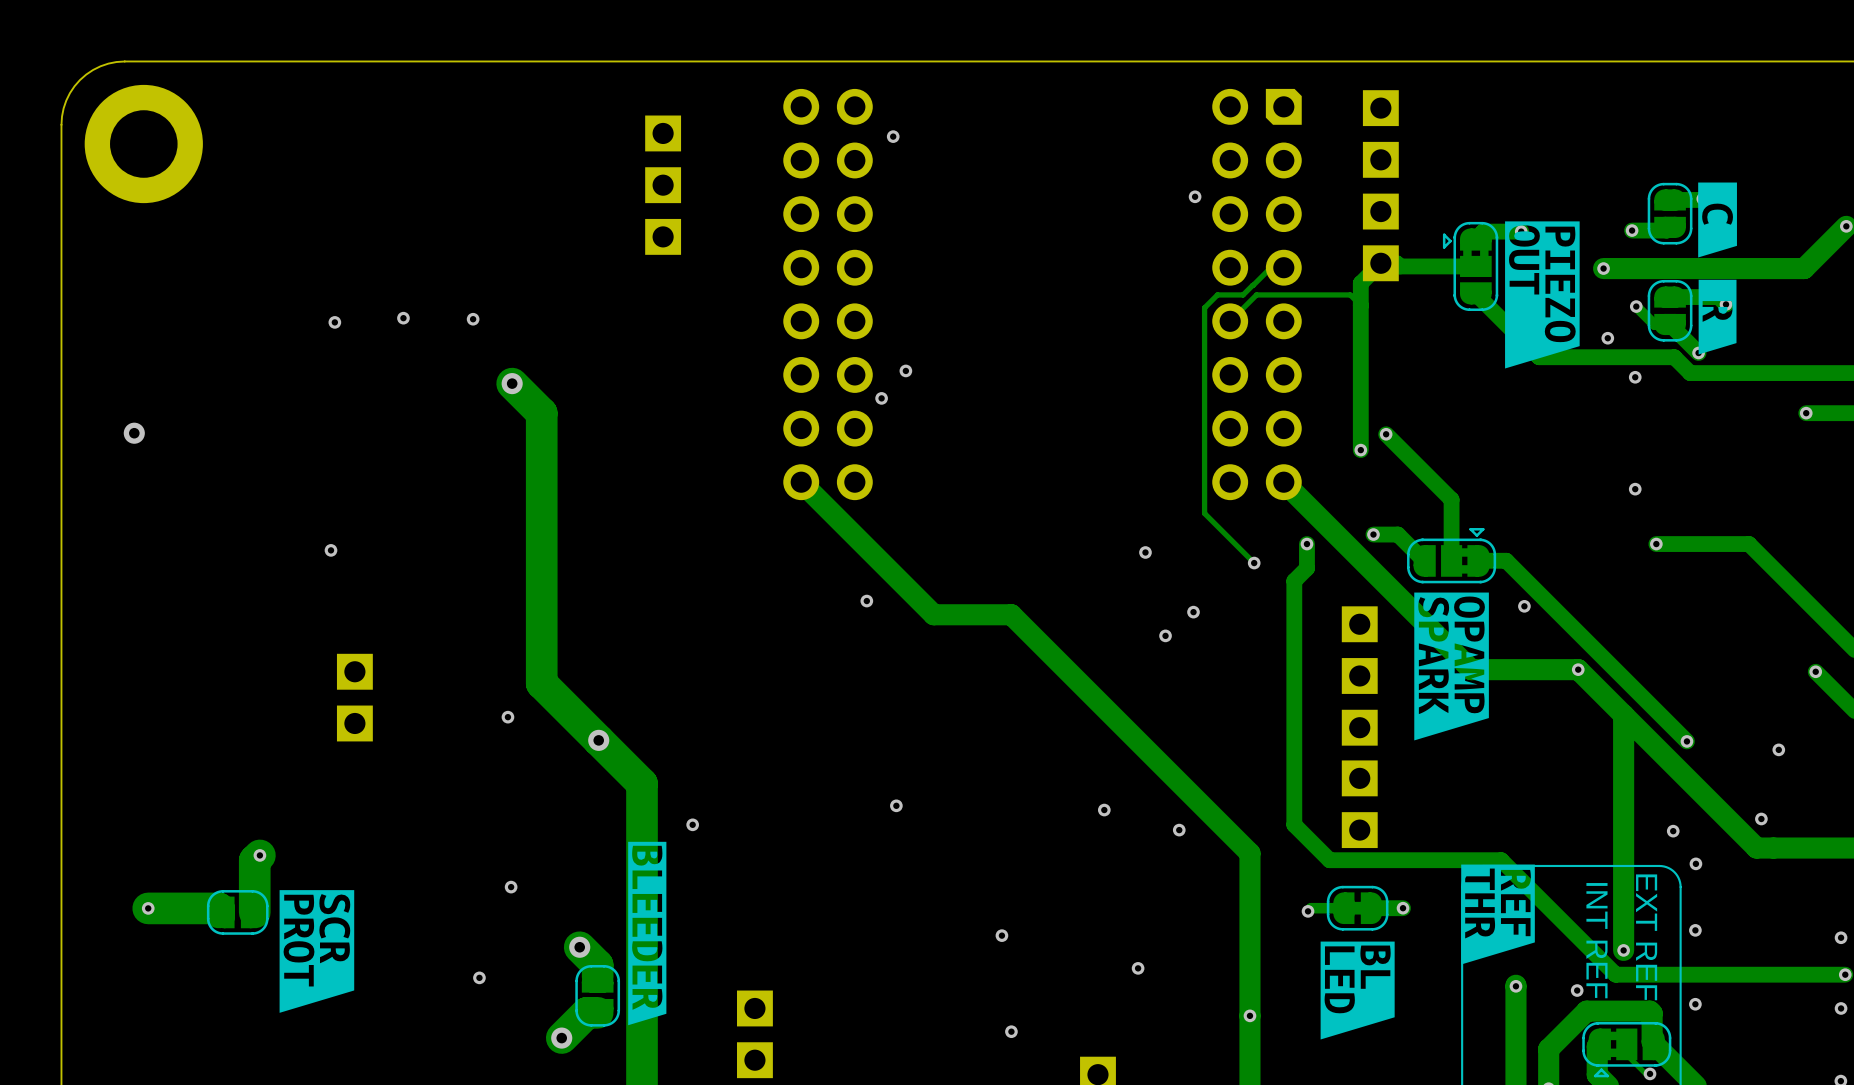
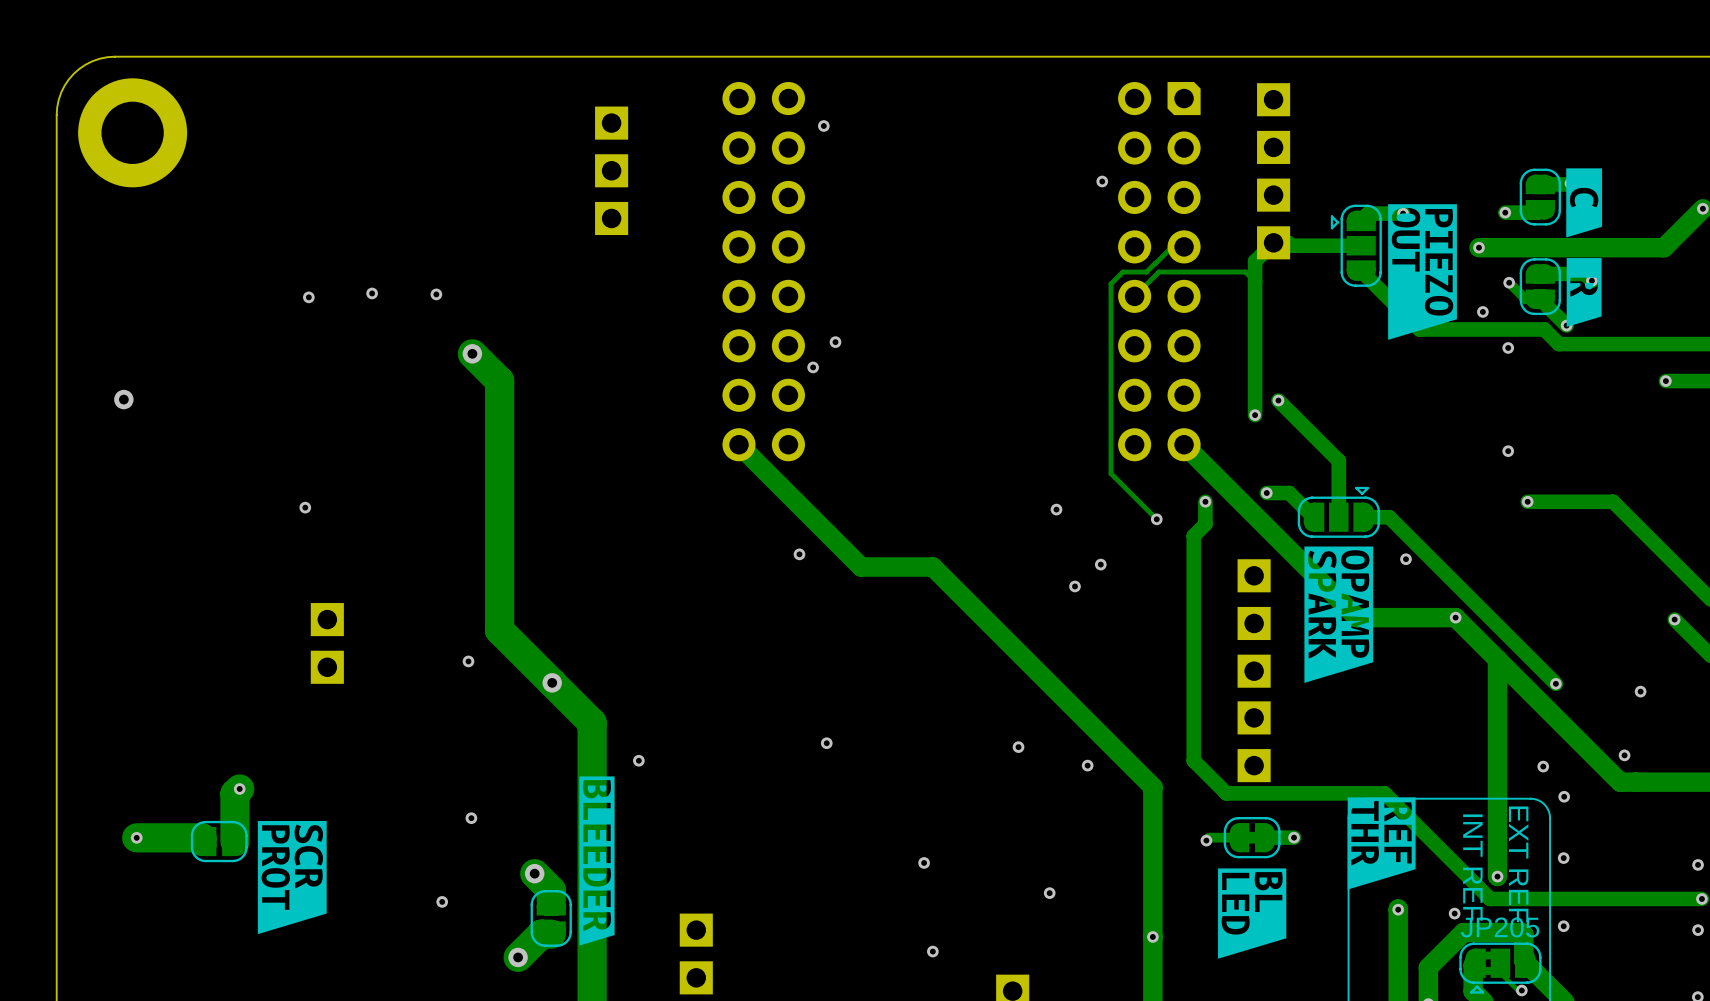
part footprint: [1442, 221, 1499, 311] -> [1330, 204, 1382, 287]
part footprint: [1407, 528, 1497, 584] -> [1297, 486, 1380, 538]
JP205 name: none -> JP205 (1500, 927)

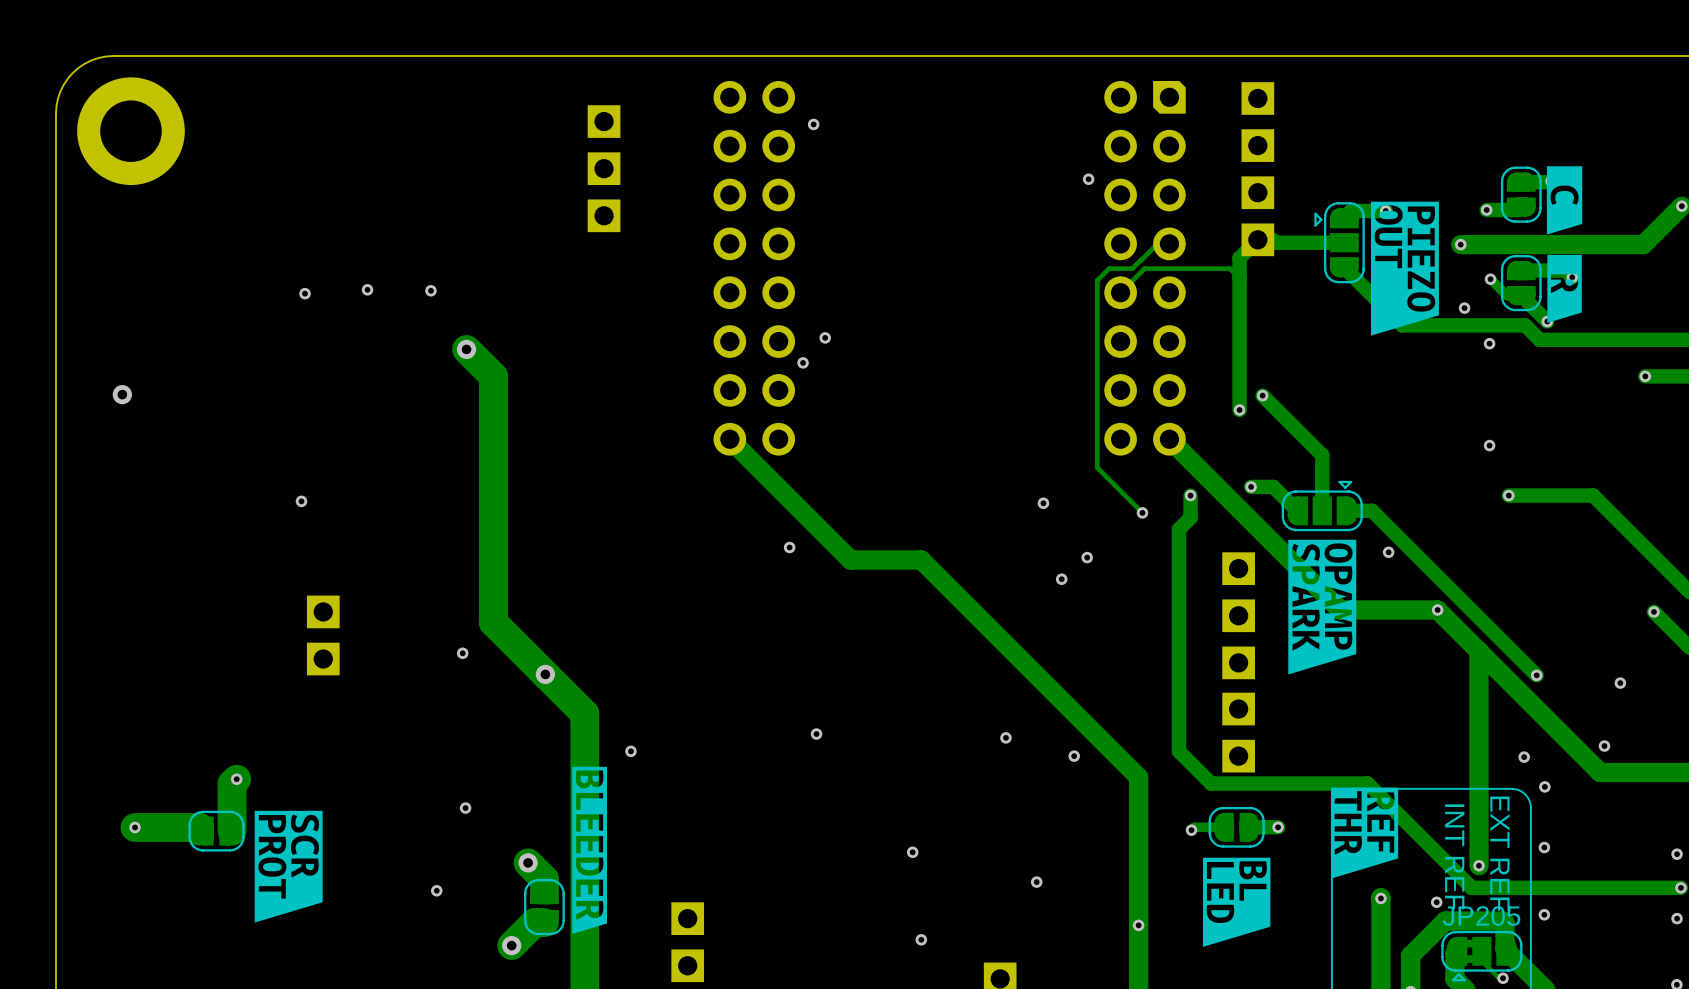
part footprint: [1223, 817, 1281, 859] -> [1208, 806, 1265, 848]

